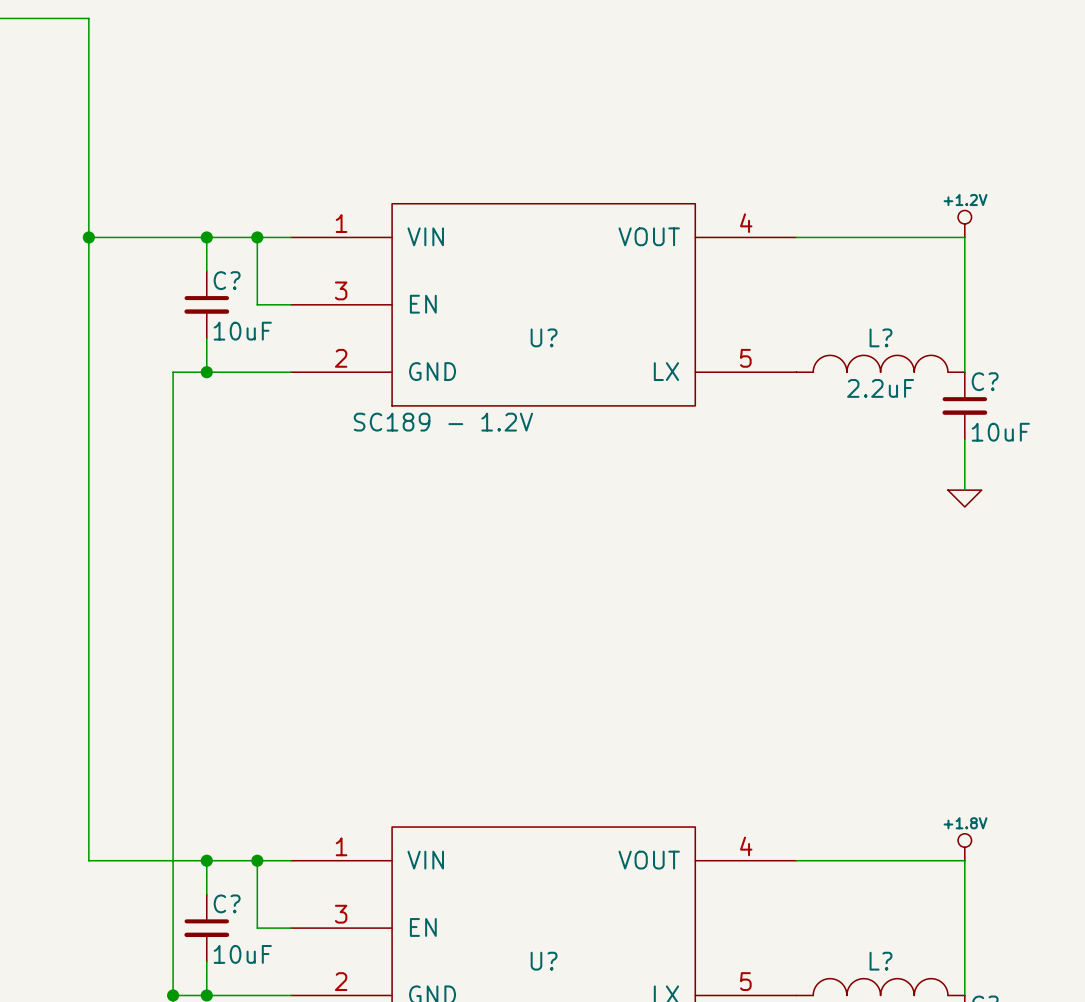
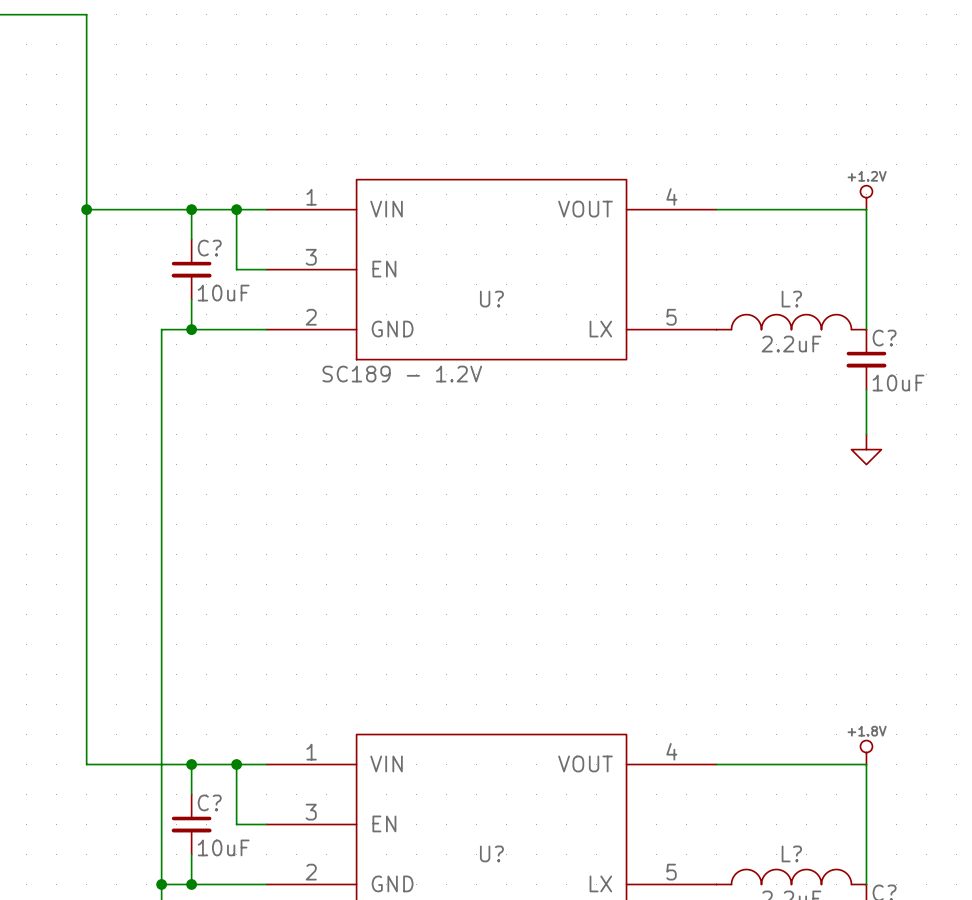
power symbol shape: [947, 490, 982, 507] -> [851, 434, 882, 465]

